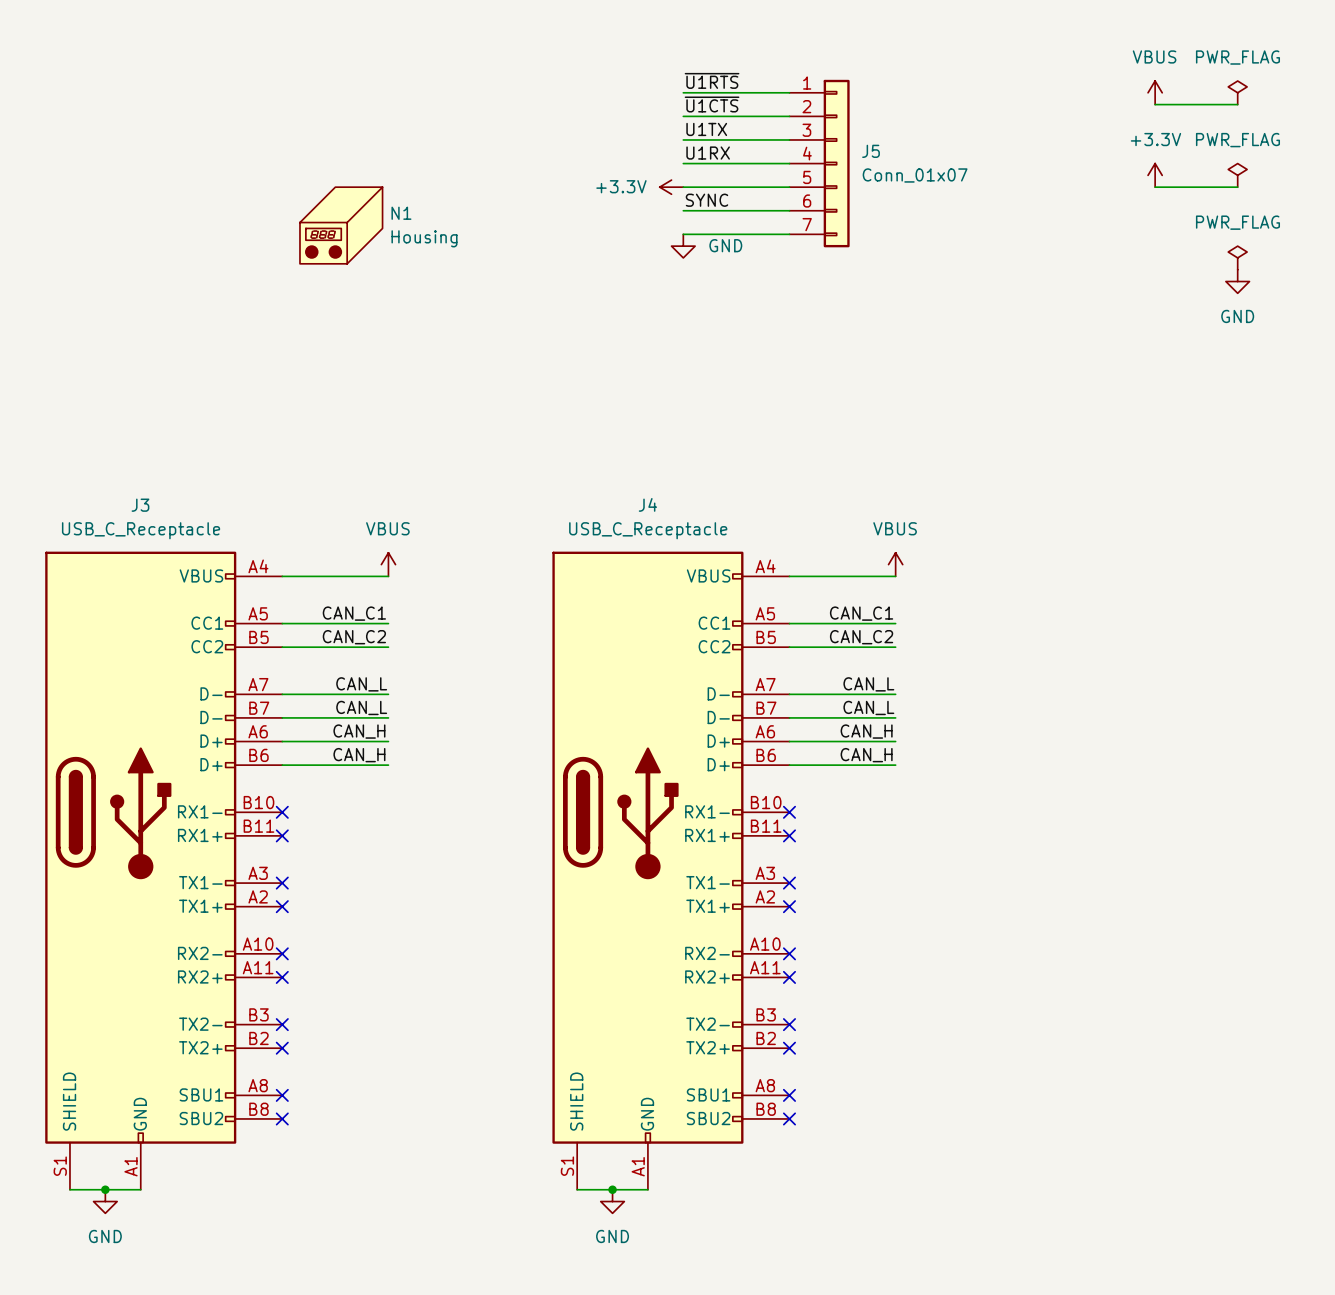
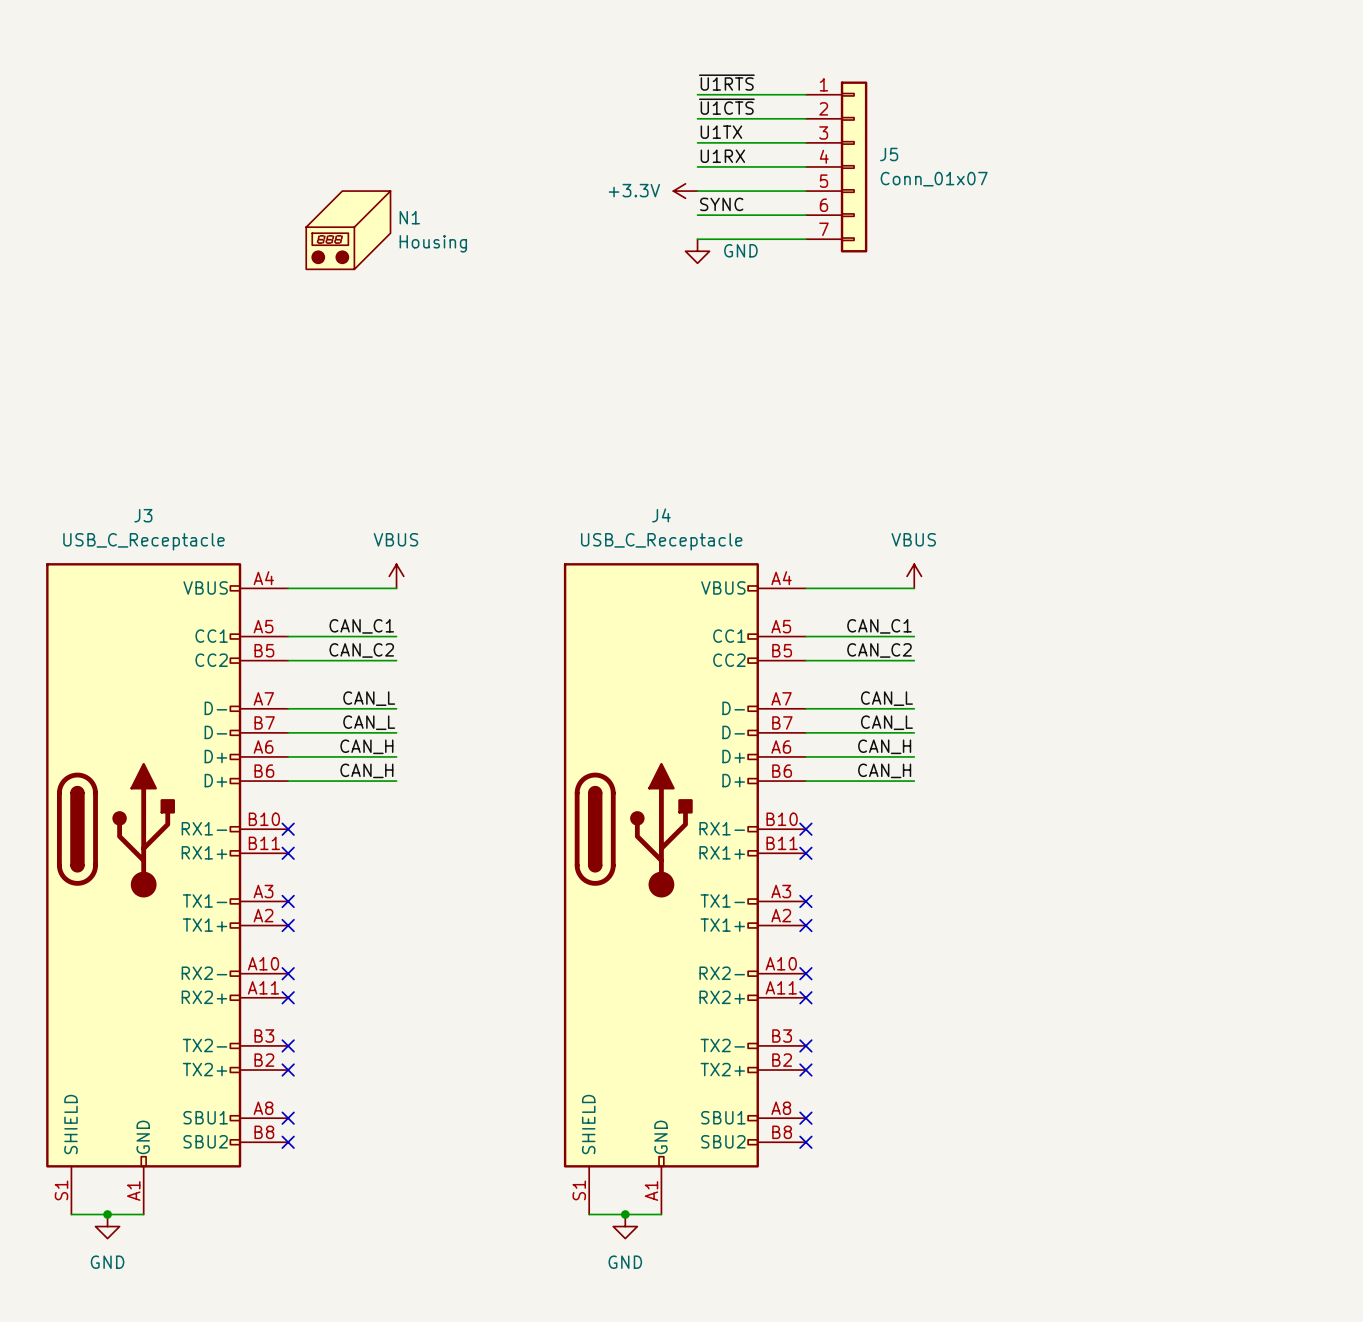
power symbol: VBUS (1155, 92) -> none
power symbol: PWR_FLAG (1237, 92) -> none
wire: (1155, 104) (1237, 104) -> none
power symbol: +3.3V (1155, 175) -> none
power symbol: PWR_FLAG (1237, 175) -> none
wire: (1155, 187) (1237, 187) -> none
power symbol: PWR_FLAG (1237, 257) -> none
power symbol: GND (1237, 281) -> none

